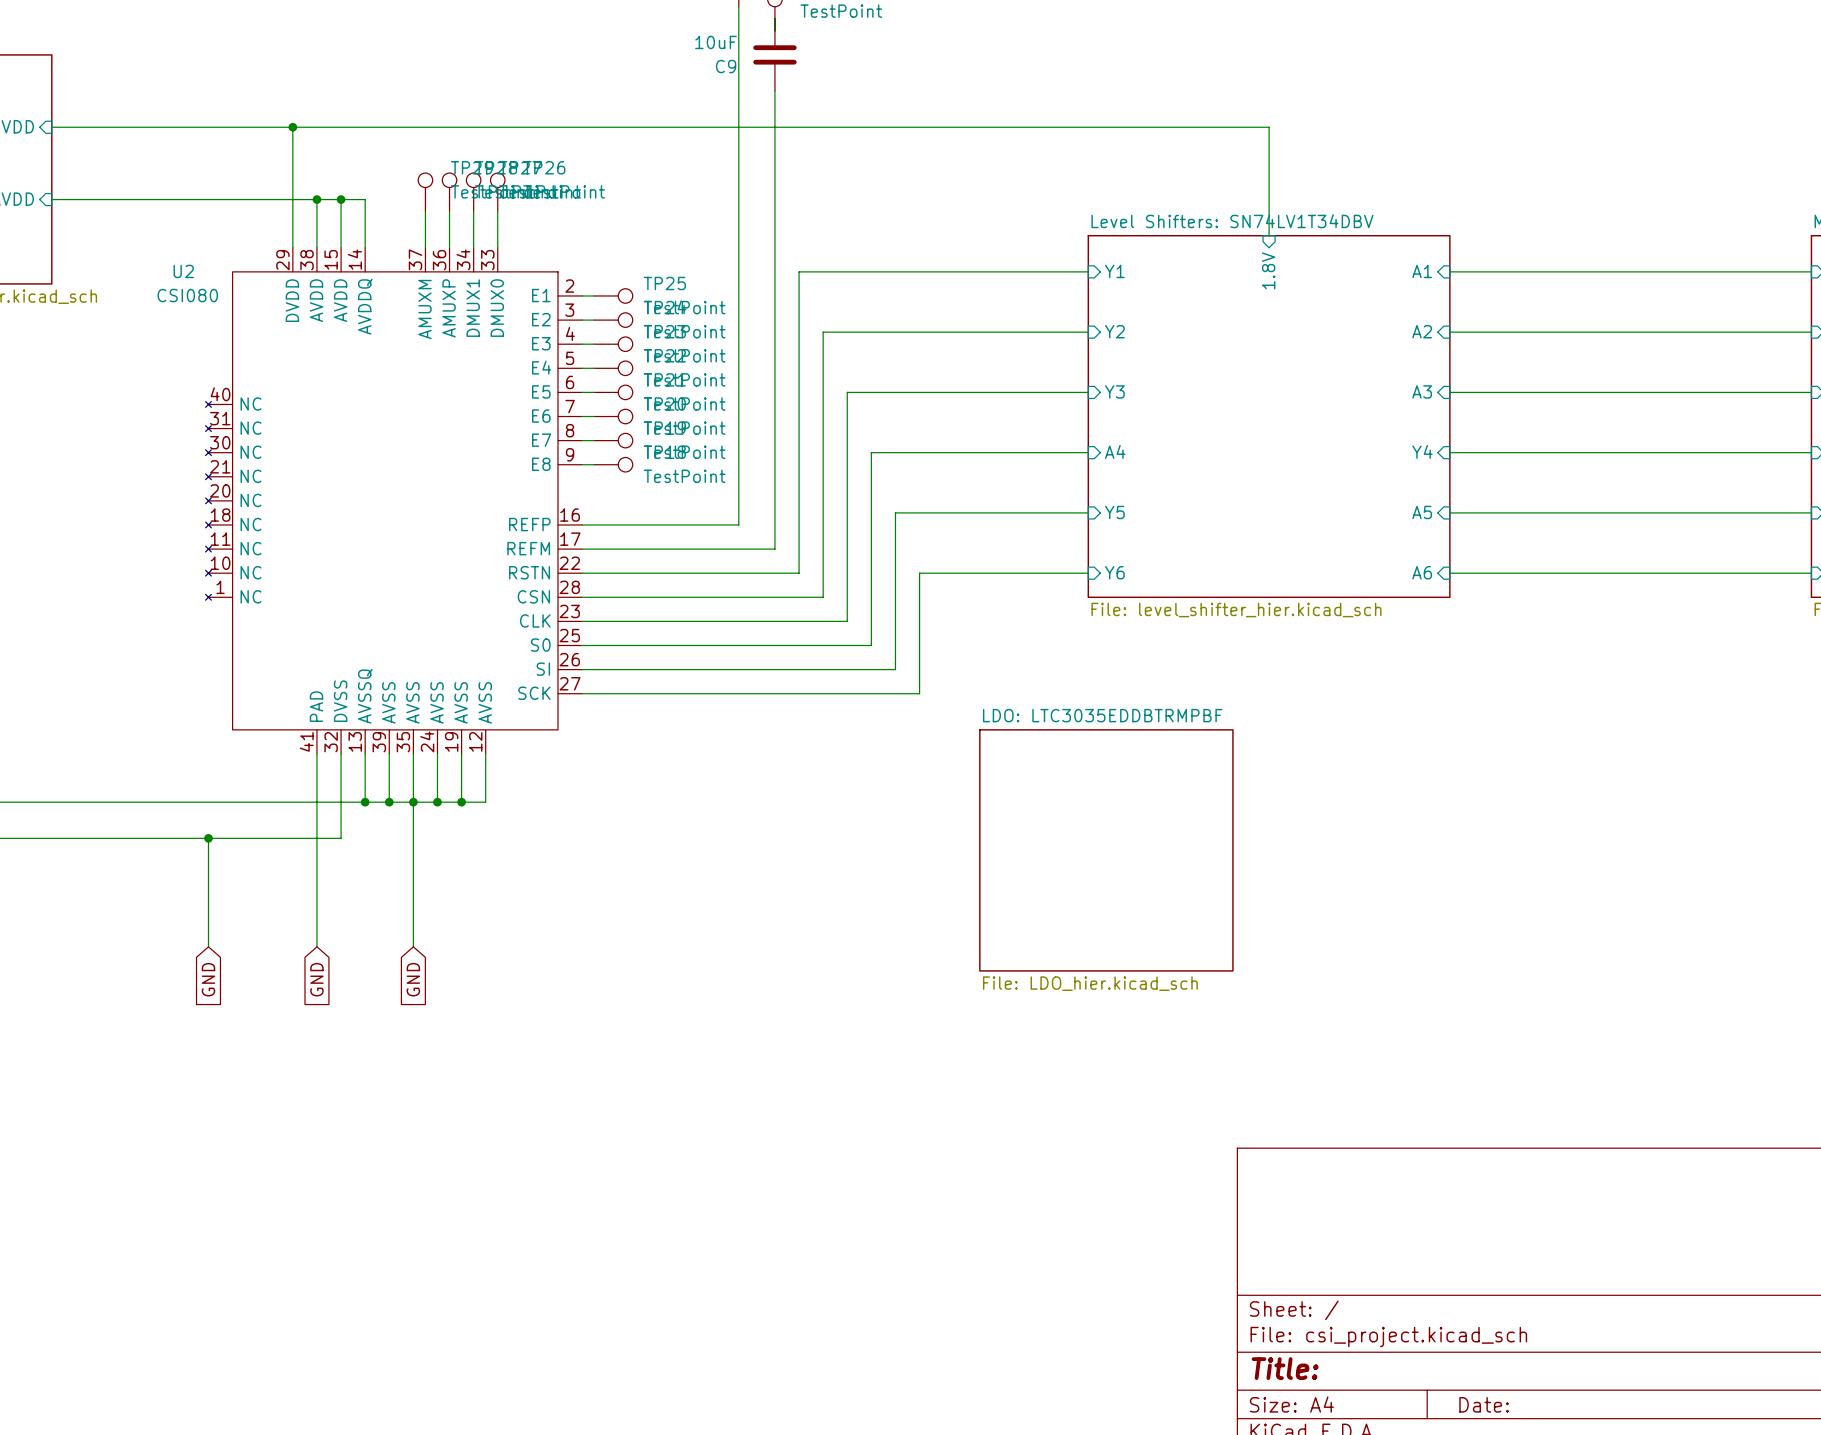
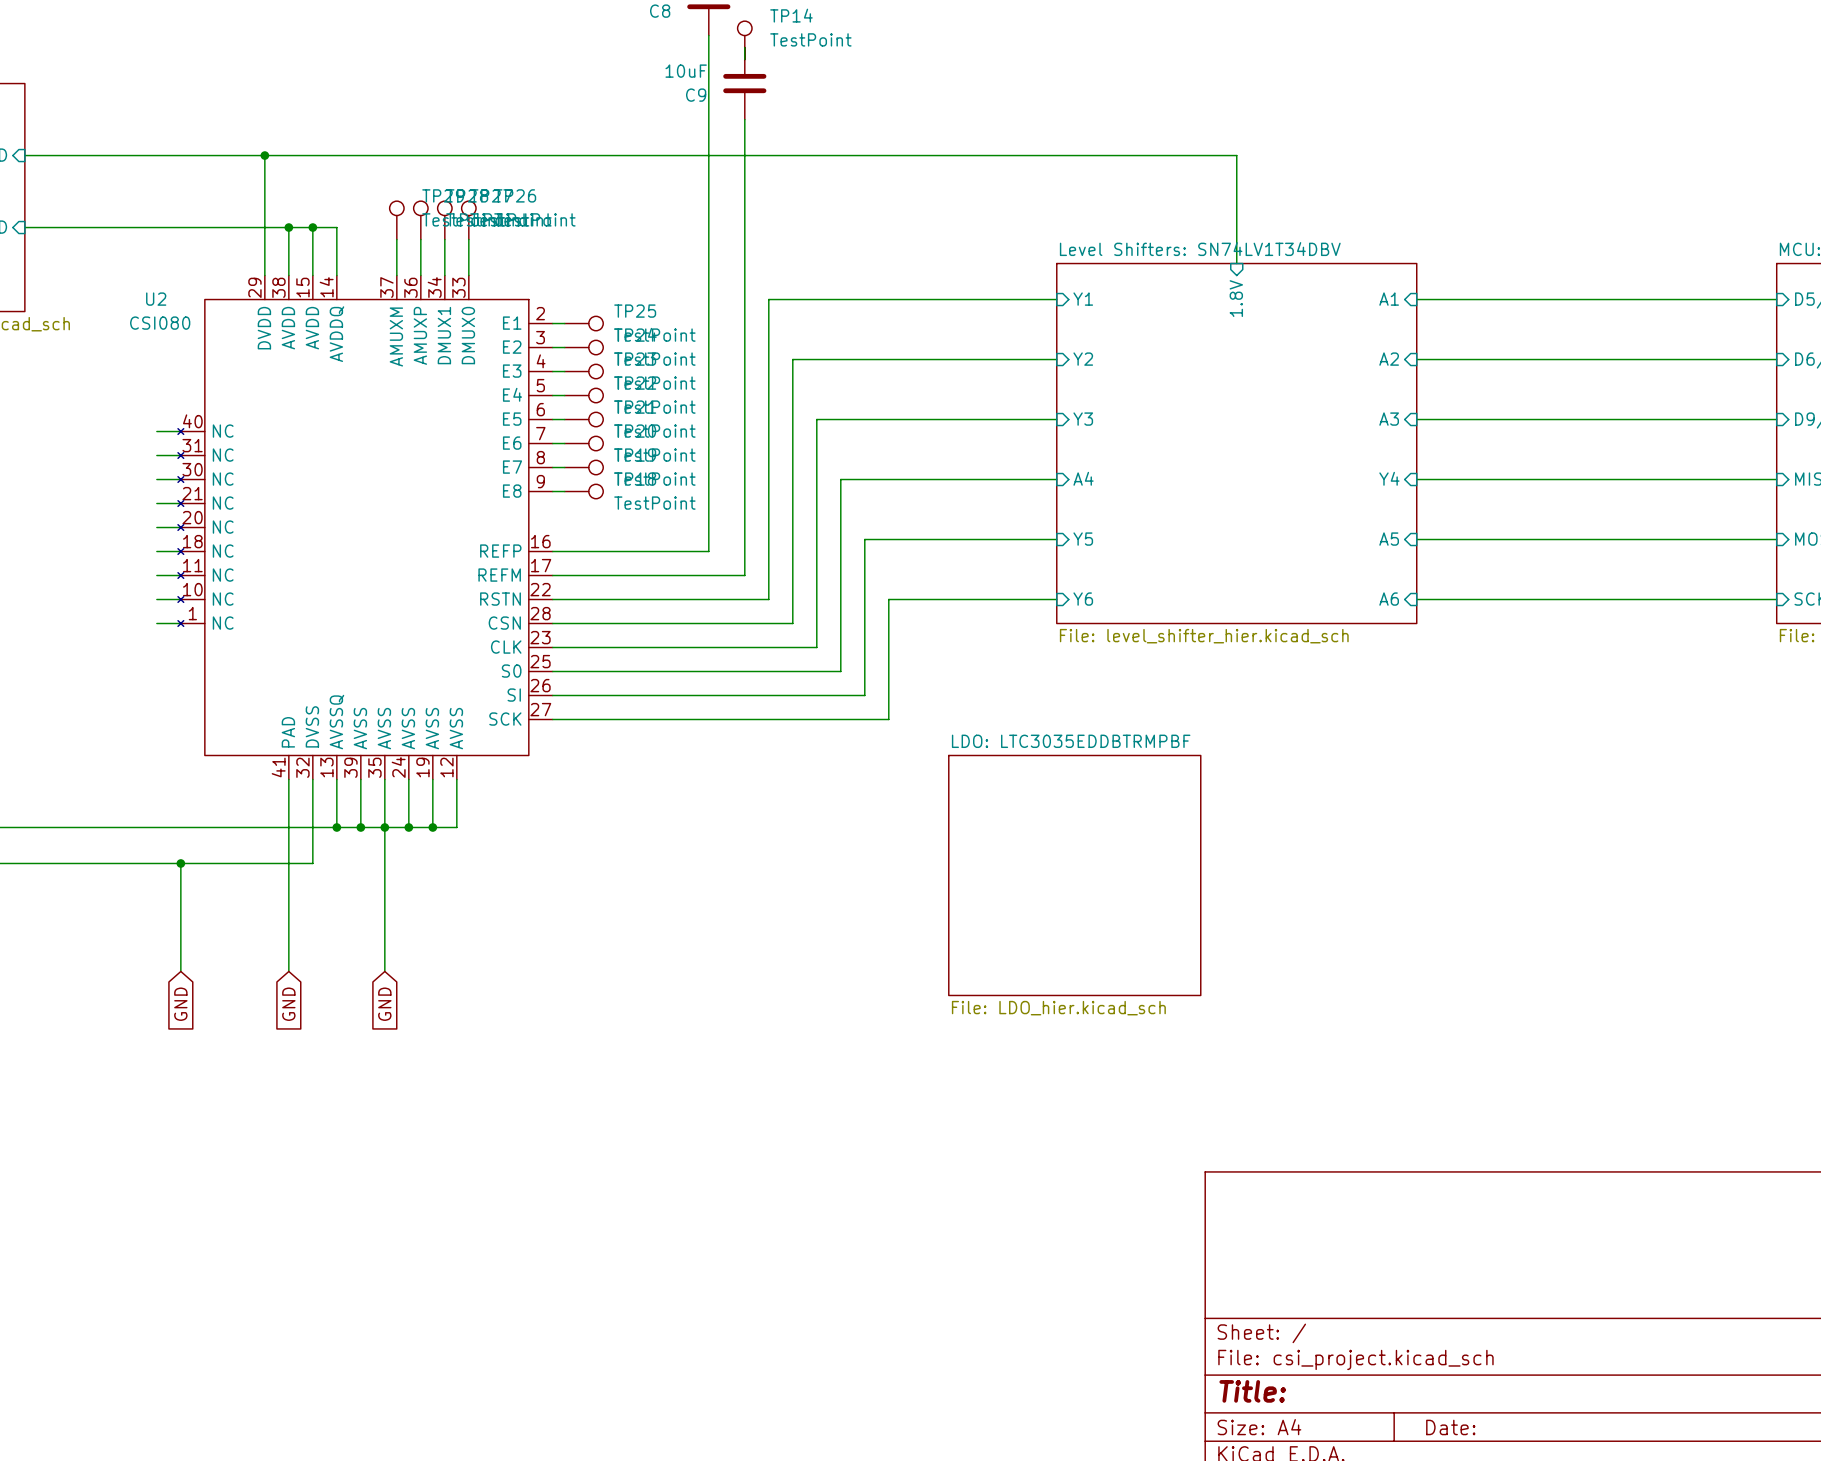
wire: none -> (156, 431) (180, 431)
wire: none -> (156, 455) (180, 455)
wire: none -> (156, 479) (180, 479)
wire: none -> (156, 503) (180, 503)
wire: none -> (156, 527) (180, 527)
wire: none -> (156, 551) (180, 551)
wire: none -> (156, 575) (180, 575)
wire: none -> (156, 599) (180, 599)
wire: none -> (156, 623) (180, 623)

